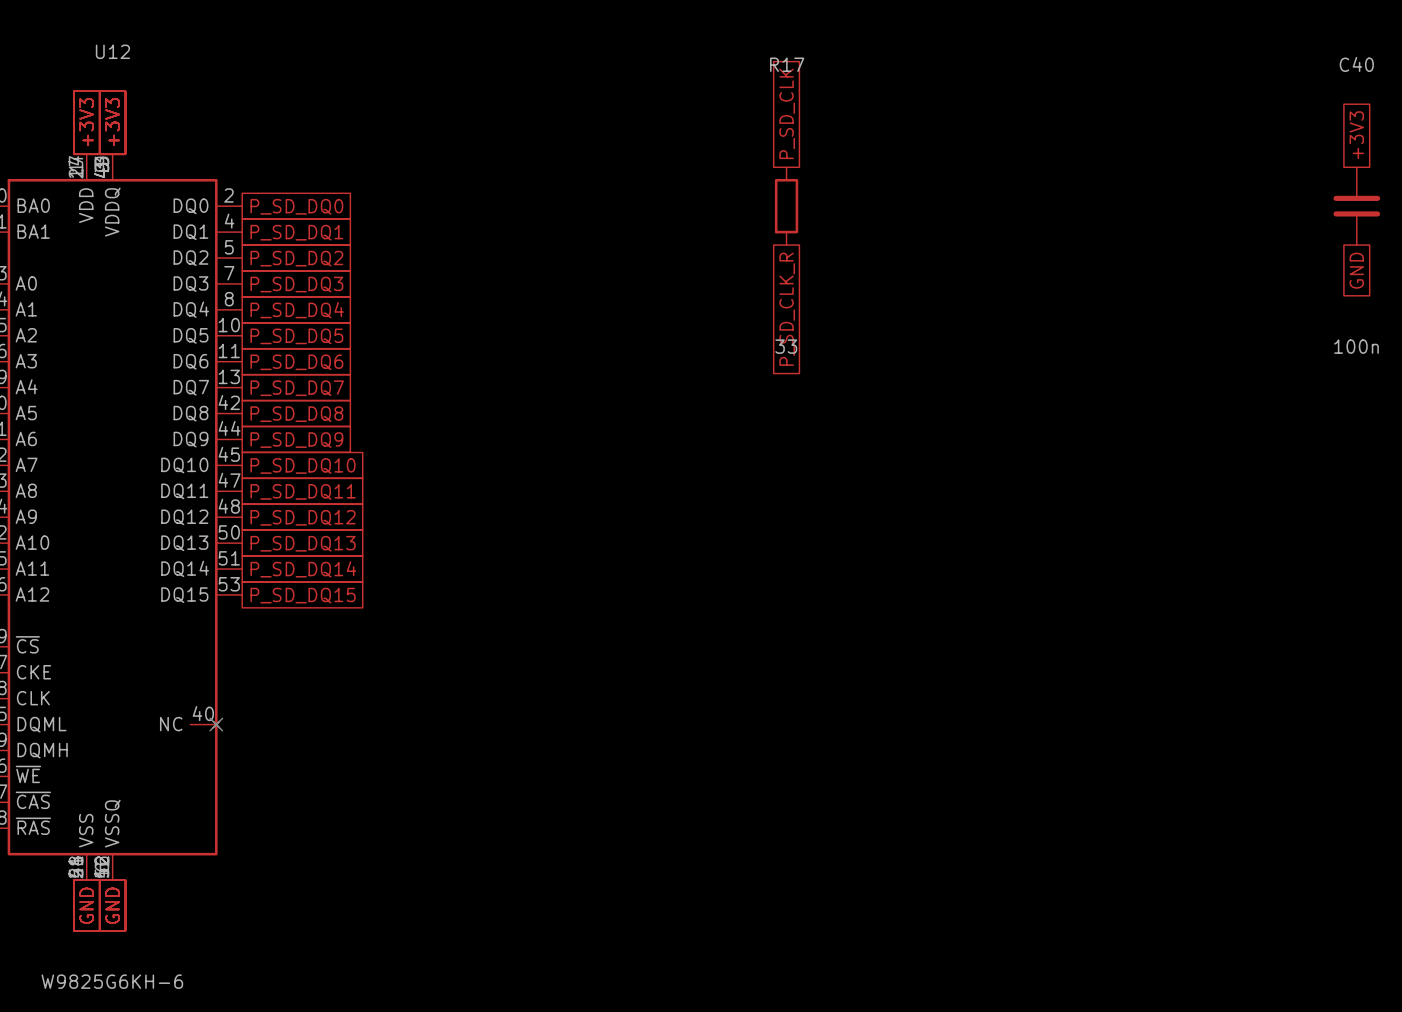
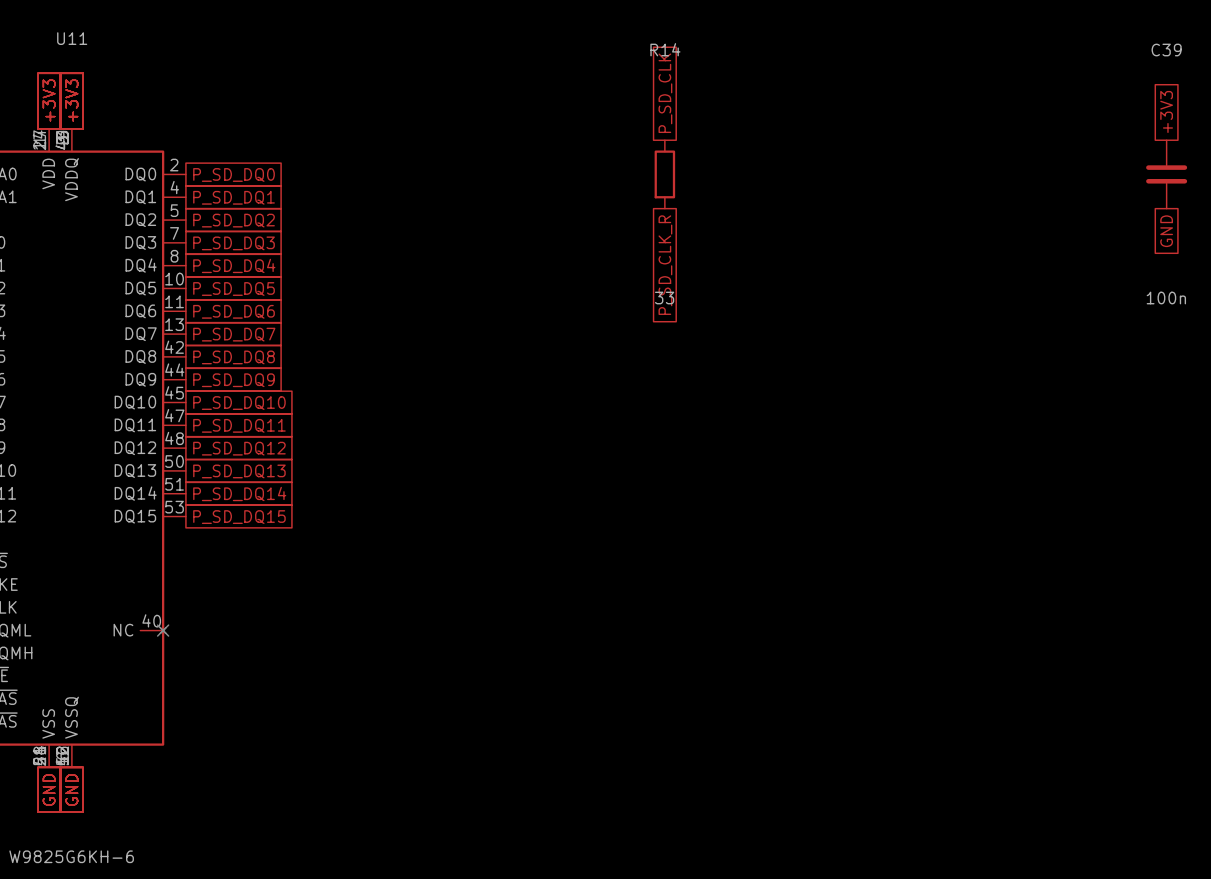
U12 name: U12 (112, 51) -> U11 (72, 38)
R17 name: R17 (787, 64) -> R14 (665, 49)
C40 name: C40 (1356, 64) -> C39 (1166, 50)

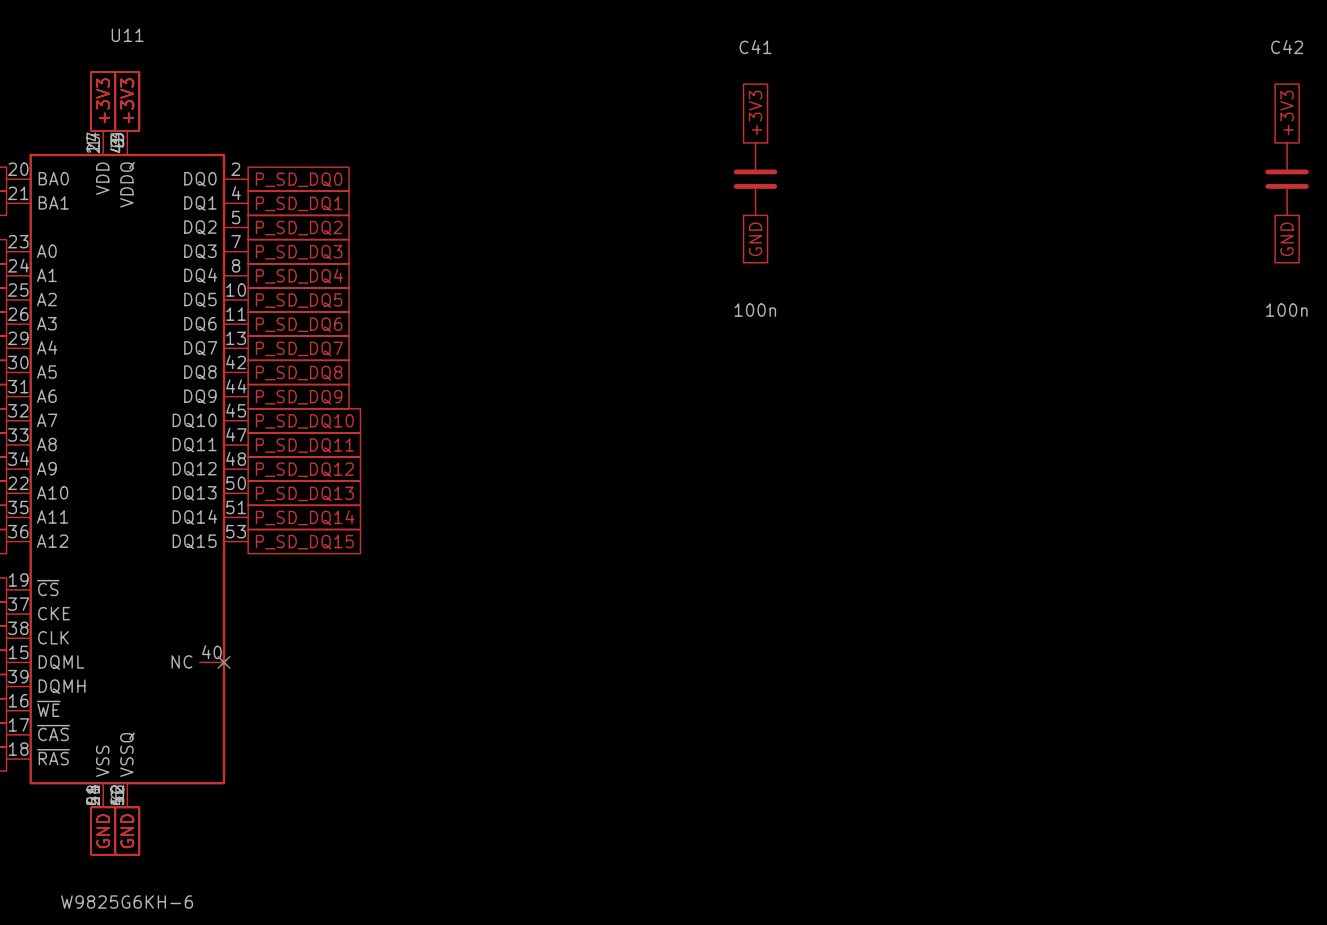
C39 name: C39 (1166, 50) -> C42 (1287, 47)
global label: P_SD_CLK (665, 93) -> +3V3 (755, 113)
R14: 33 (664, 174) -> none
C41: none -> 100n (755, 179)
global label: P_SD_CLK_R (665, 265) -> GND (755, 239)

